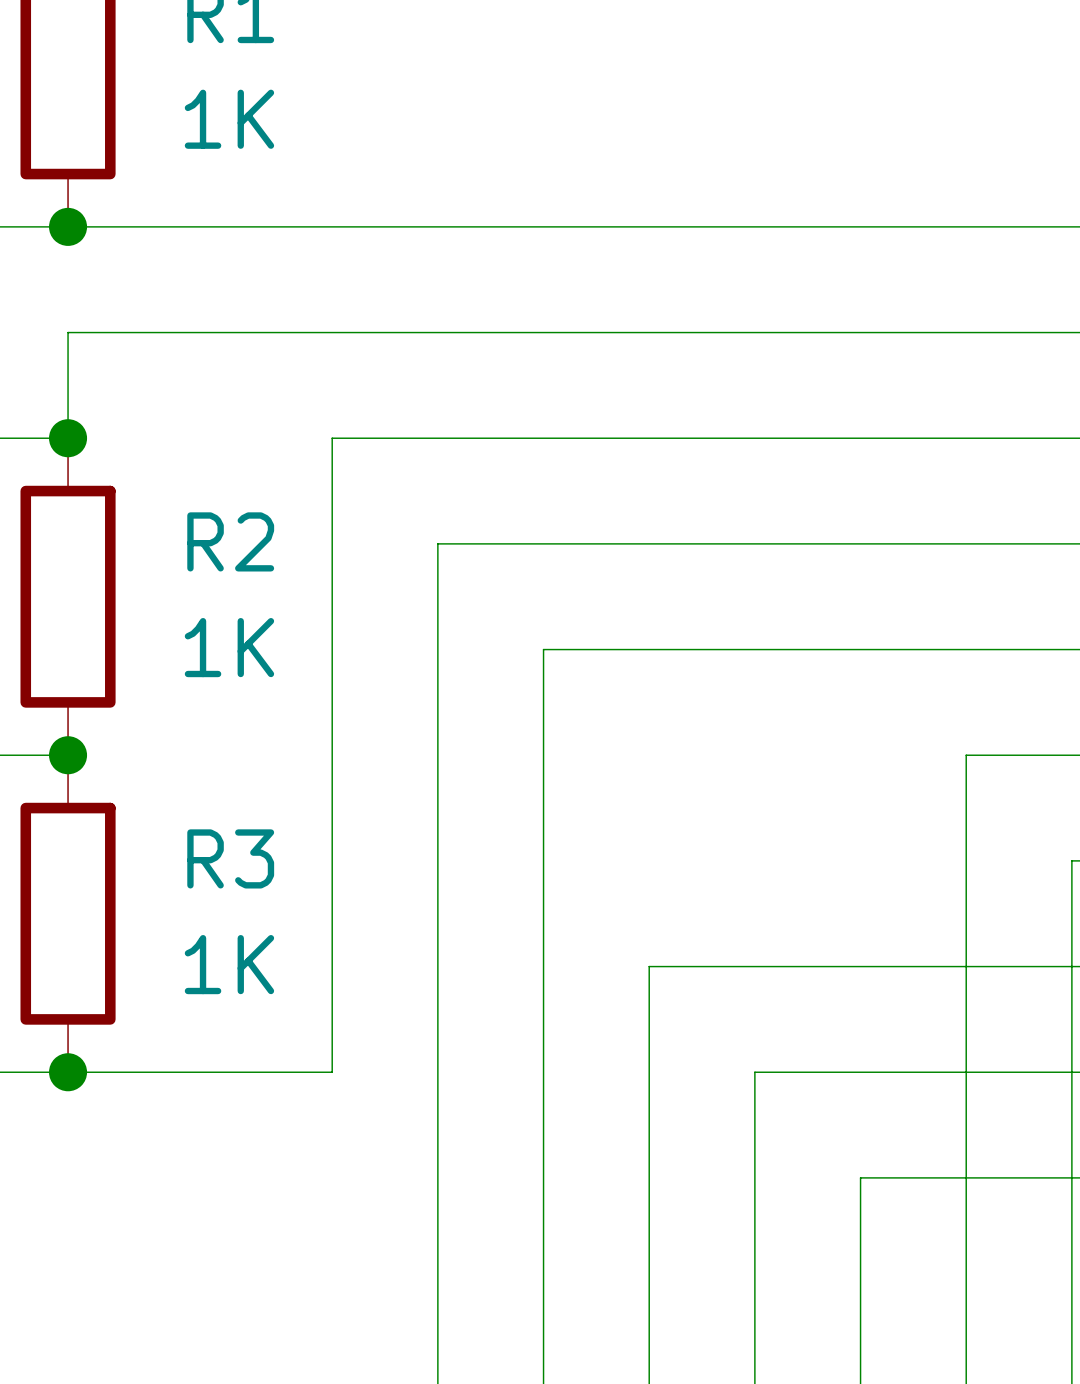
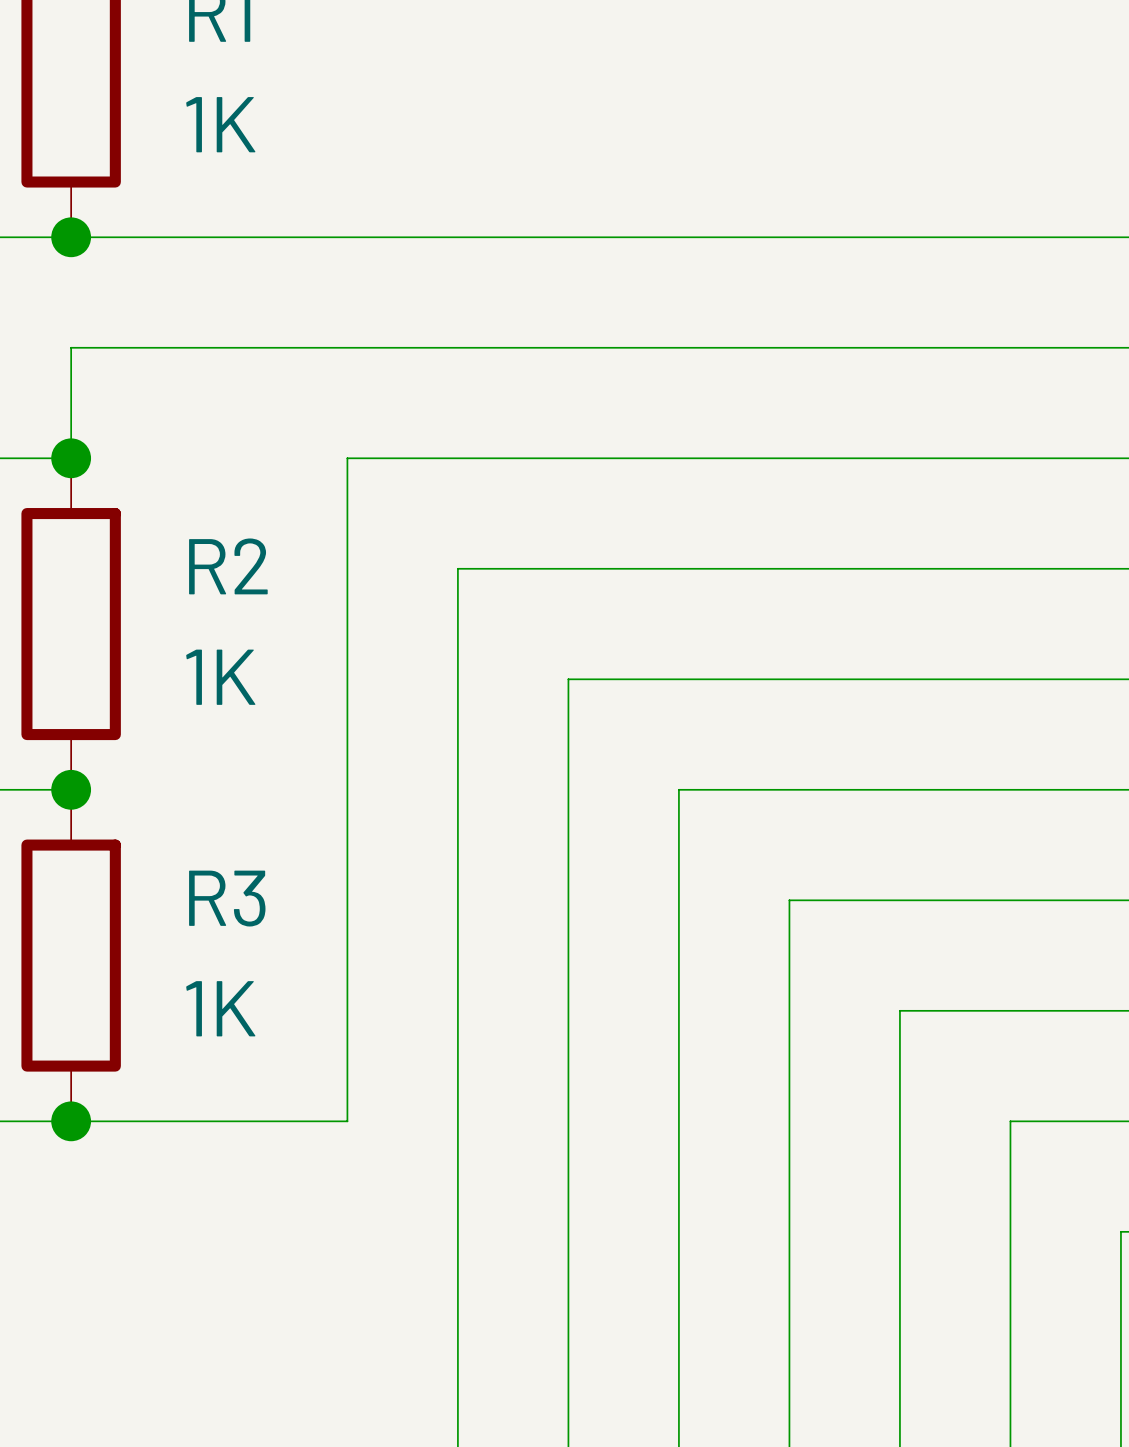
wire: (966, 755) (966, 1072) (754, 1072) -> (1010, 789) (678, 789) (678, 1010)
wire: (1071, 860) (1071, 1177) (860, 1177) -> (1120, 900) (789, 900) (789, 1121)
wire: (649, 966) (860, 966) -> (899, 1231) (899, 1010)

